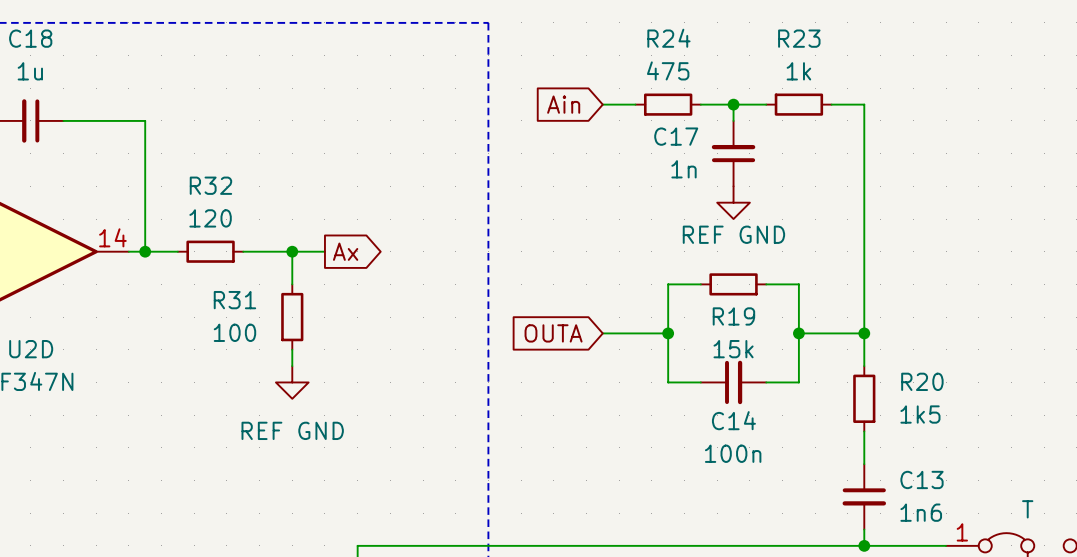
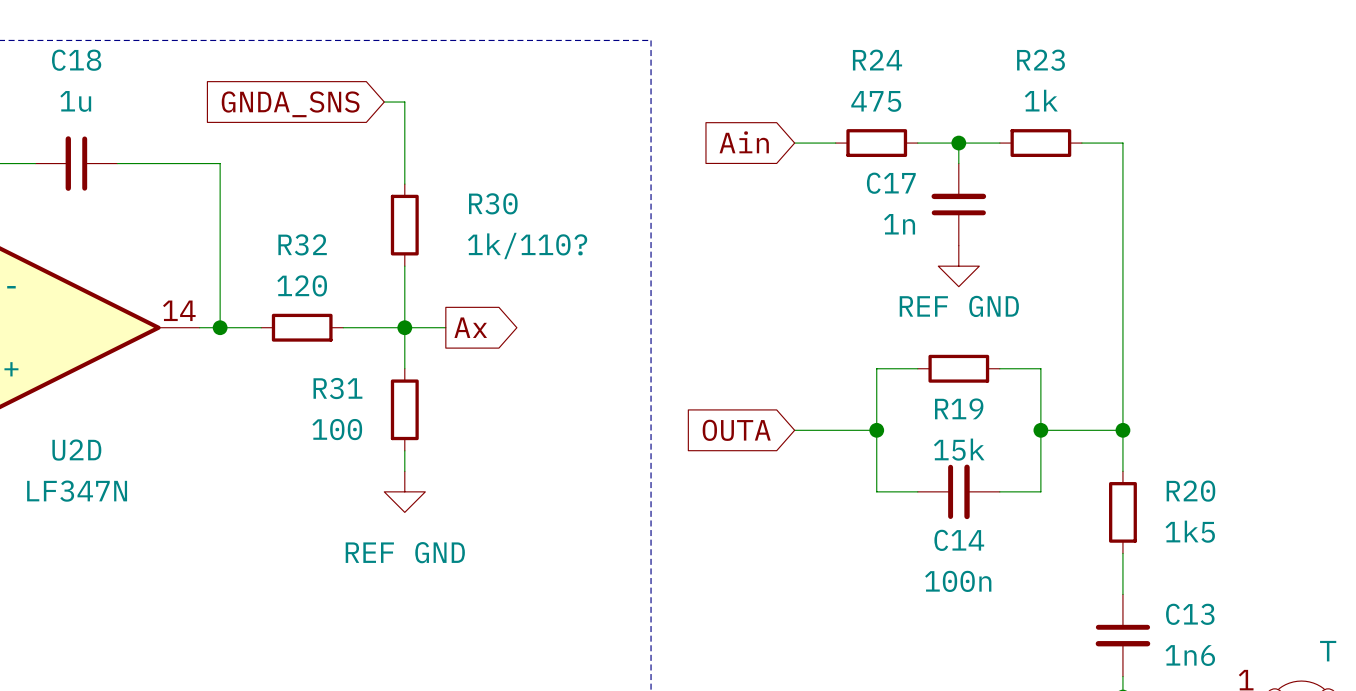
wire: none -> (384, 102) (404, 102) (404, 184)
global label: none -> GNDA_SNS (290, 104)
R30: none -> 1k/110? (404, 225)
wire: none -> (404, 266) (404, 327)

